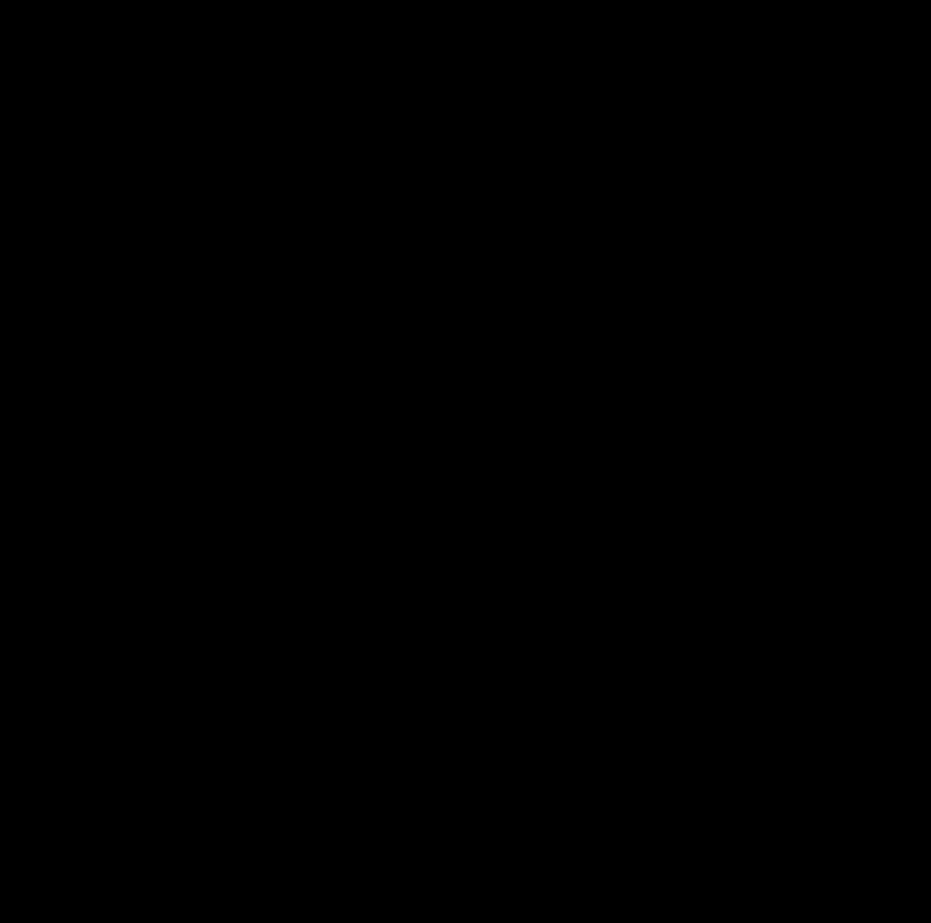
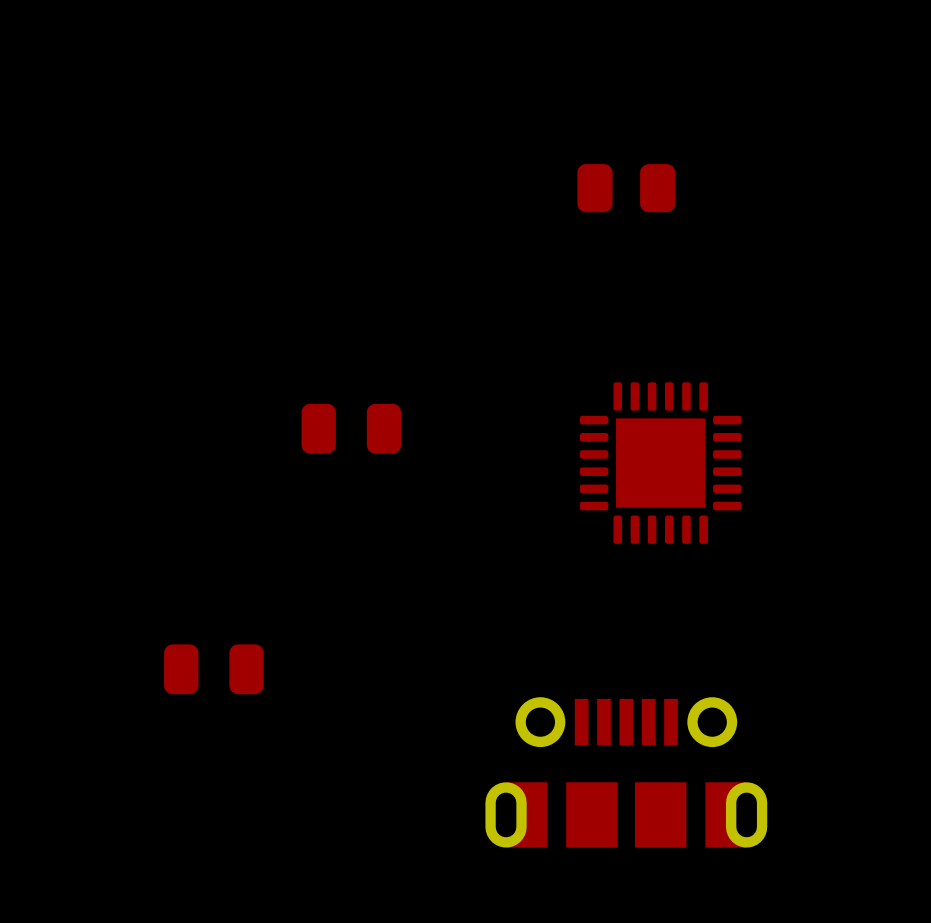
part: none -> (626, 188)
part: none -> (351, 428)
part: none -> (660, 463)
part: none -> (213, 669)
part: none -> (626, 772)

